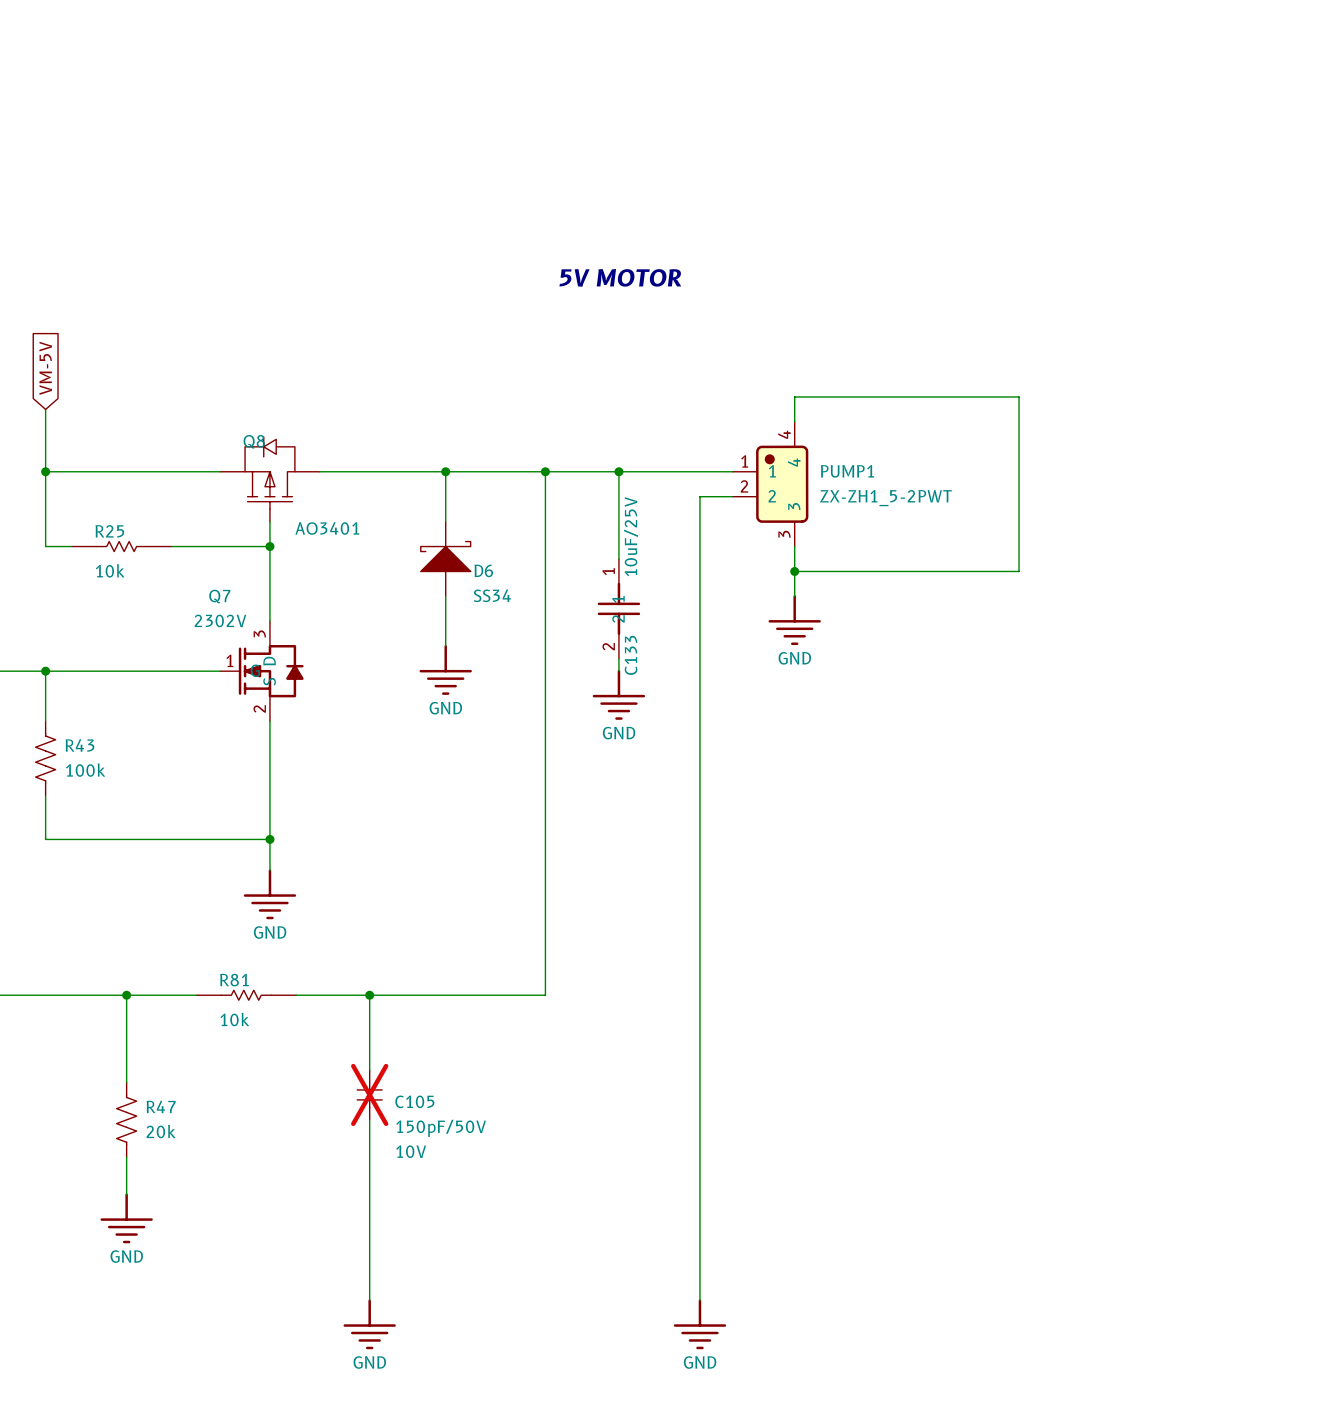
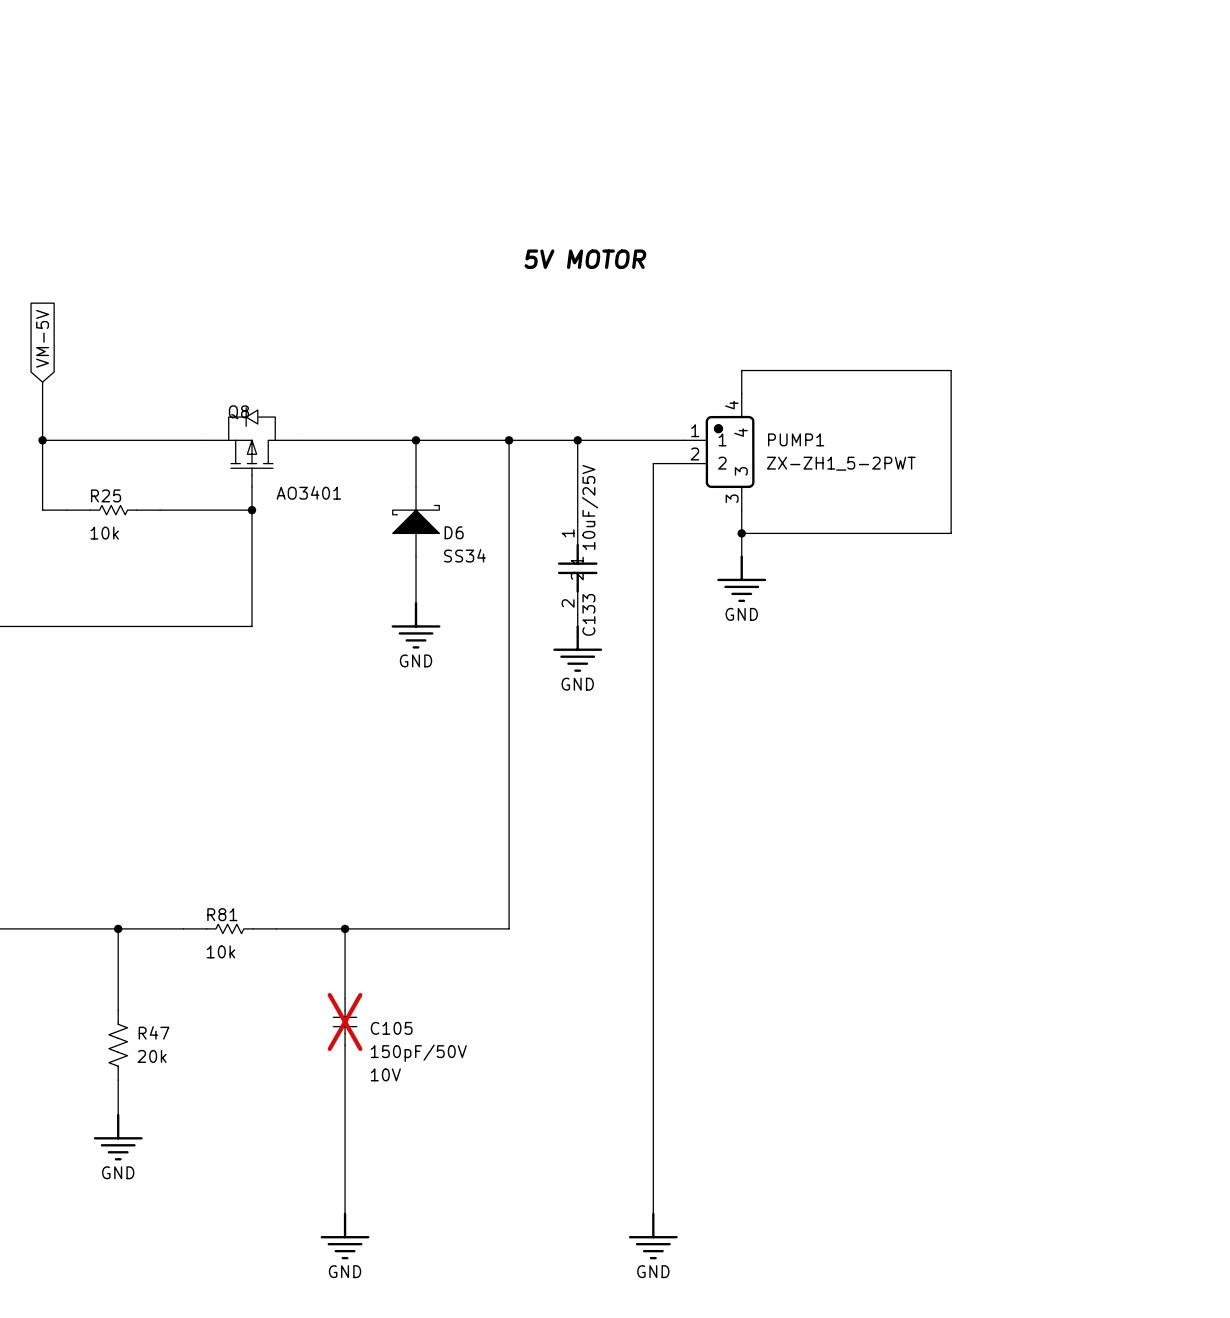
wire: (45, 671) (45, 721) -> none
junction: (45, 671) -> none
Q7: 2302V (261, 671) -> none
wire: (269, 721) (269, 870) -> none
R43: 100k (45, 758) -> none
wire: (45, 795) (45, 839) (269, 839) -> none
junction: (269, 839) -> none
power symbol: GND (269, 894) -> none

